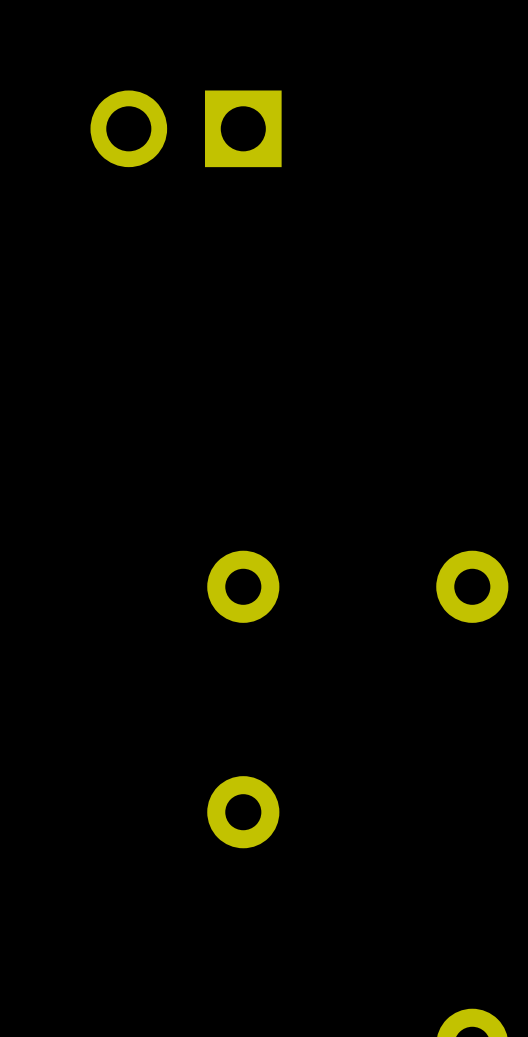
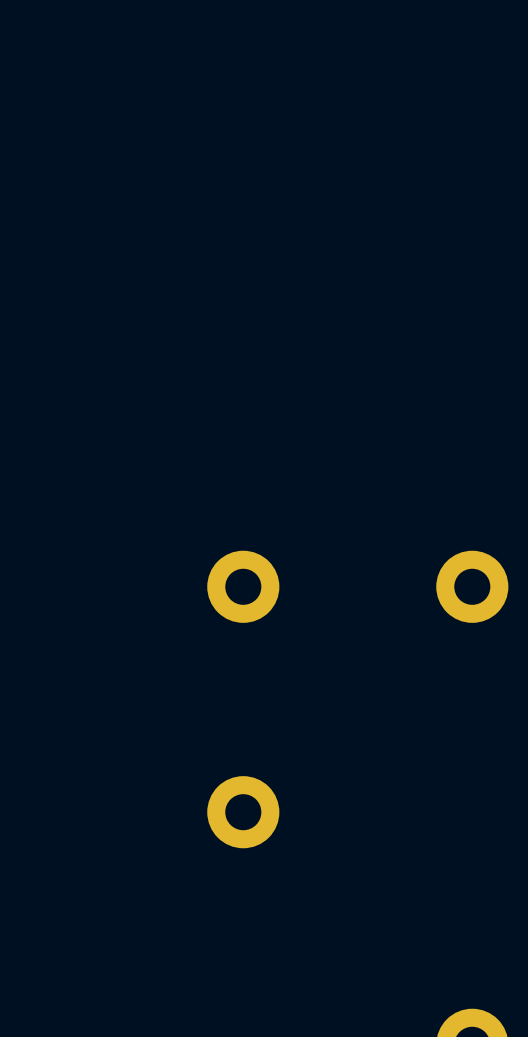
part: (186, 128) -> none

